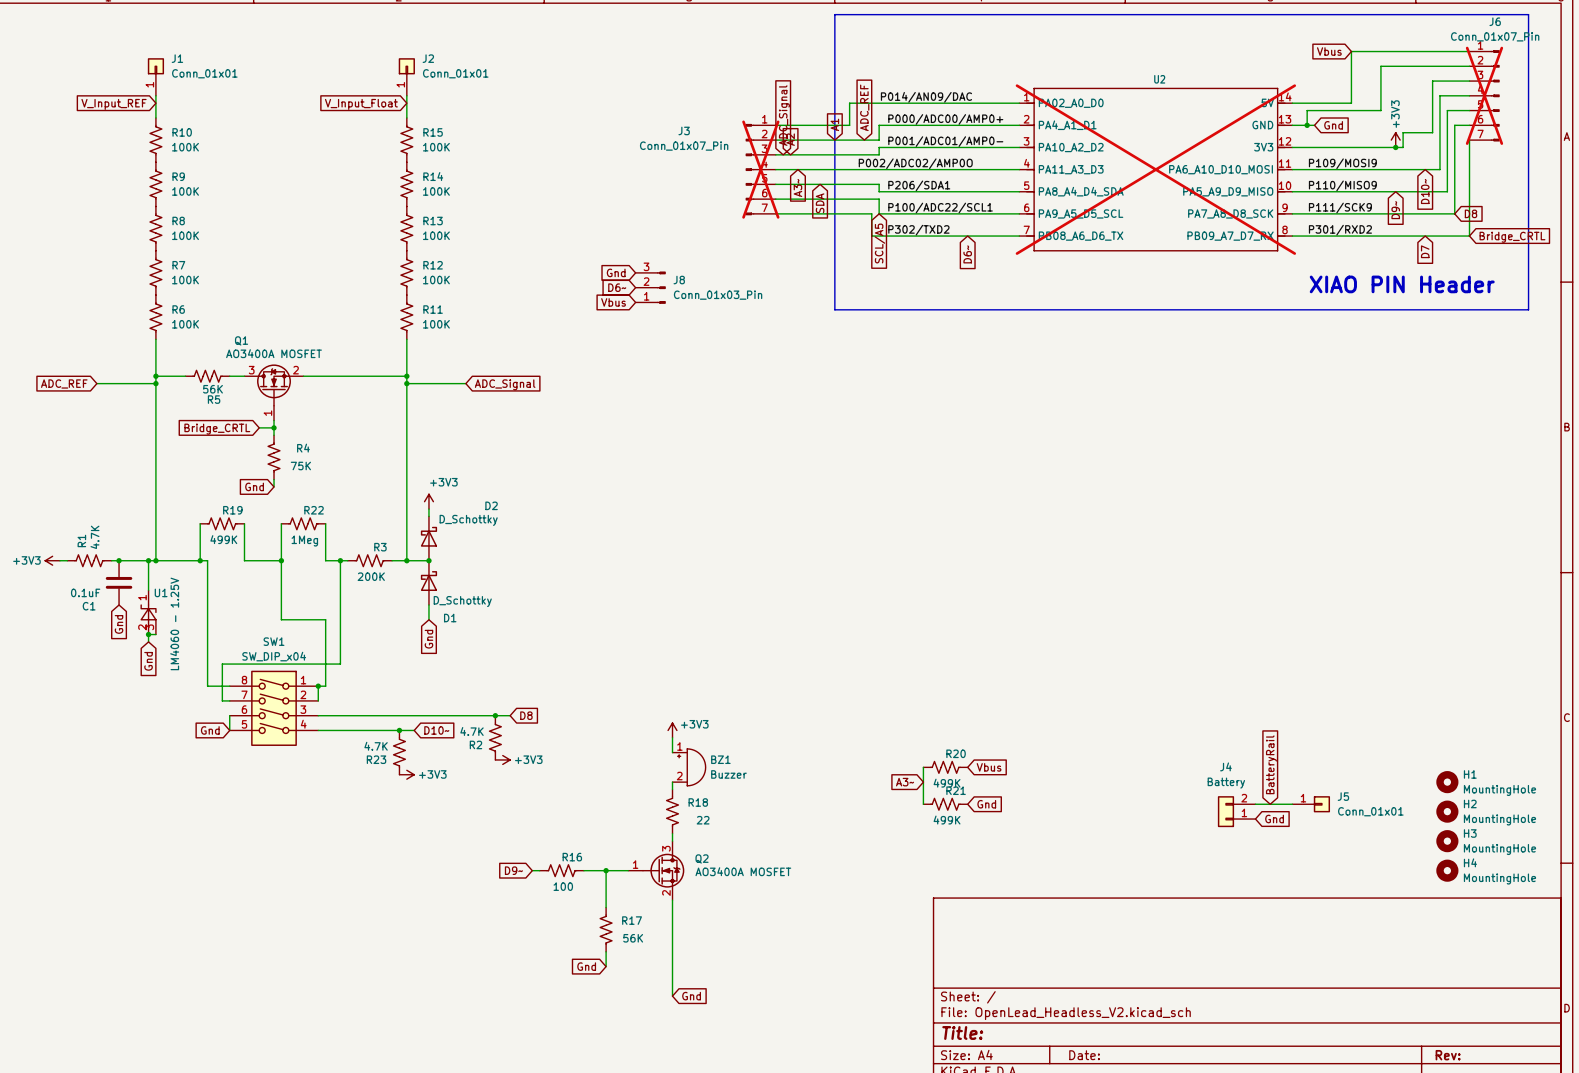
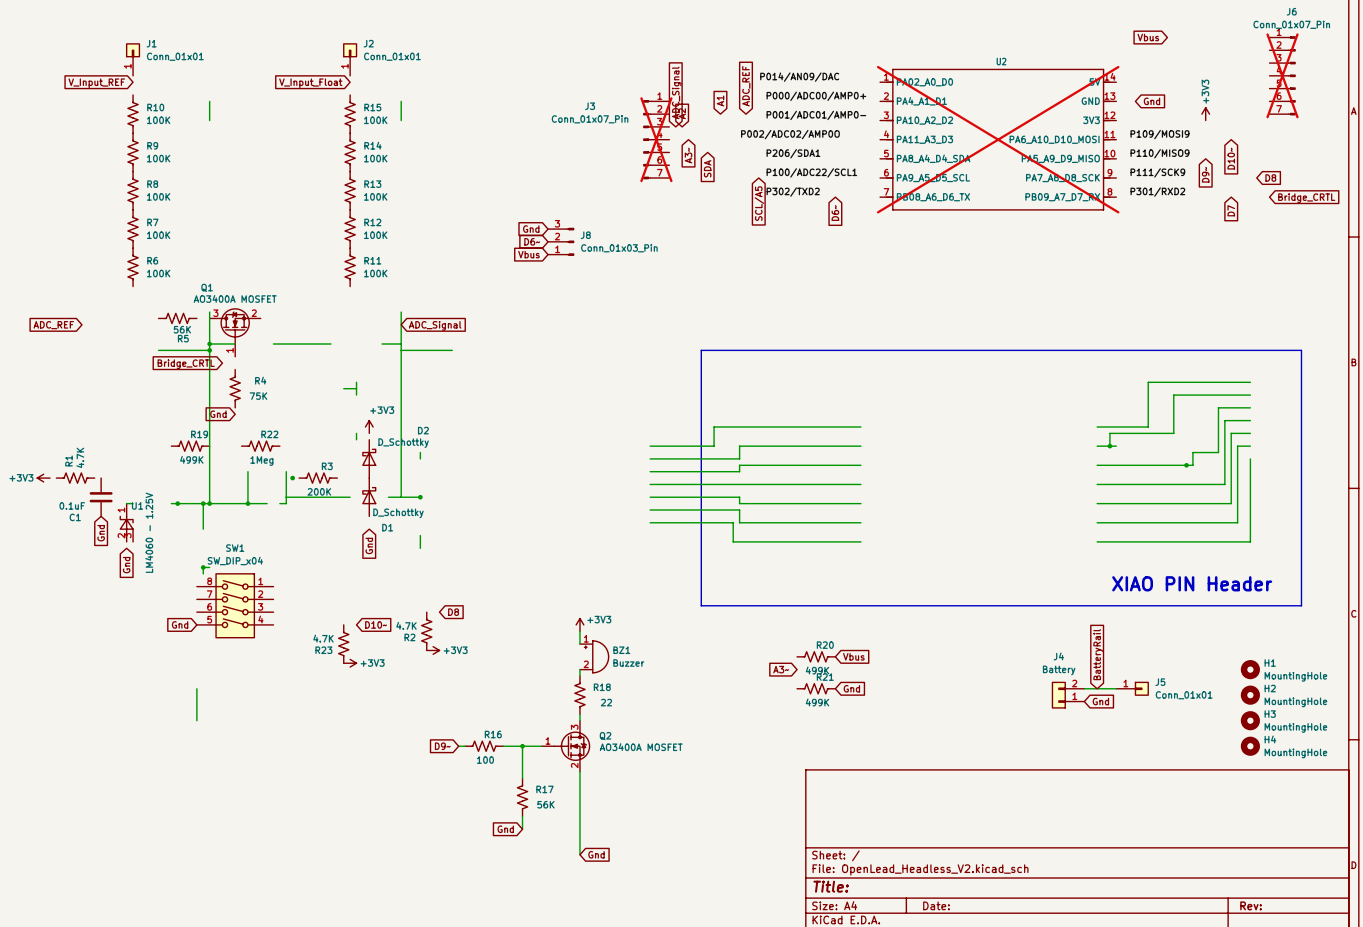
line: (834, 14) (1528, 14) (1528, 309) (834, 309) (834, 14) -> none
wire: (1469, 51) (1351, 51) (1351, 103) (1292, 103) -> none
wire: (1469, 66) (1380, 66) (1380, 110) (1307, 110) (1307, 125) -> none
wire: (1469, 81) (1432, 81) (1432, 132) (1403, 132) (1403, 147) (1292, 147) -> none
wire: (155, 95) (155, 117) -> (209, 101) (209, 120)
wire: (406, 95) (406, 117) -> (401, 101) (401, 120)
wire: (1469, 95) (1439, 95) (1439, 169) (1292, 169) -> none
wire: (1019, 103) (849, 103) (849, 125) (775, 125) -> none
wire: (1469, 110) (1447, 110) (1447, 191) (1292, 191) -> none
wire: (1019, 125) (879, 125) (879, 140) (775, 140) -> none
wire: (1292, 125) (1314, 125) -> none
junction: (1307, 125) -> none
wire: (1469, 125) (1454, 125) (1454, 213) (1292, 213) -> none
wire: (1469, 140) (1469, 236) (1292, 236) -> none
wire: (1019, 147) (879, 147) (879, 154) (775, 154) -> none
junction: (1395, 147) -> none
wire: (775, 169) (1019, 169) -> none
wire: (775, 184) (879, 184) (879, 191) (1019, 191) -> none
wire: (775, 199) (879, 199) (879, 213) (1019, 213) -> none
wire: (775, 213) (871, 213) (871, 236) (1019, 236) -> none
text: XIAO PIN Header (1402, 284) -> none
wire: (155, 339) (155, 560) -> none
wire: (406, 339) (406, 560) -> none
wire: none -> (209, 312) (209, 446)
wire: none -> (401, 312) (401, 497)
wire: (155, 376) (185, 376) -> (209, 343) (235, 343)
junction: (155, 376) -> none
wire: (229, 376) (244, 376) -> none
wire: (303, 376) (406, 376) -> none
junction: (406, 376) -> none
wire: (96, 383) (155, 383) -> (158, 350) (209, 350)
junction: (155, 383) -> none
wire: (406, 383) (465, 383) -> (401, 350) (452, 350)
junction: (406, 383) -> none
junction: none -> (209, 343)
wire: none -> (273, 343) (330, 343)
wire: none -> (382, 343) (401, 343)
junction: none -> (209, 350)
line: none -> (701, 350) (1301, 350) (1301, 605) (701, 605) (701, 350)
wire: (274, 420) (274, 435) -> (356, 382) (356, 395)
wire: (259, 427) (274, 427) -> (343, 388) (356, 388)
junction: (274, 427) -> none
wire: none -> (1250, 382) (1148, 382) (1148, 427) (1097, 427)
wire: none -> (1250, 395) (1173, 395) (1173, 433) (1109, 433) (1109, 446)
wire: (274, 479) (274, 486) -> (356, 433) (356, 439)
wire: none -> (1250, 407) (1218, 407) (1218, 452) (1192, 452) (1192, 465) (1097, 465)
wire: none -> (1250, 420) (1224, 420) (1224, 484) (1097, 484)
wire: none -> (860, 427) (714, 427) (714, 446) (650, 446)
wire: (428, 509) (428, 516) -> (420, 452) (420, 458)
wire: none -> (1250, 433) (1231, 433) (1231, 503) (1097, 503)
wire: (200, 523) (200, 560) -> (247, 471) (247, 503)
wire: (281, 523) (281, 619) (325, 619) (325, 686) (318, 686) (318, 700) -> none
wire: (325, 523) (325, 560) (347, 560) -> none
wire: none -> (860, 446) (739, 446) (739, 458) (650, 458)
wire: none -> (1097, 446) (1116, 446)
junction: none -> (1109, 446)
wire: none -> (1250, 446) (1237, 446) (1237, 522) (1097, 522)
wire: none -> (1250, 458) (1250, 541) (1097, 541)
wire: none -> (860, 465) (739, 465) (739, 471) (650, 471)
junction: none -> (1186, 465)
wire: none -> (286, 471) (286, 503) (279, 503)
wire: (59, 560) (67, 560) -> none
wire: (111, 560) (207, 560) (207, 686) (229, 686) -> none
junction: (119, 560) -> none
wire: (148, 560) (148, 590) -> (133, 503) (126, 503)
junction: (148, 560) -> none
junction: (155, 560) -> none
junction: (200, 560) -> none
wire: (244, 560) (281, 560) -> (209, 478) (209, 503)
junction: (281, 560) -> none
wire: (340, 560) (340, 664) (244, 664) -> none
wire: (392, 560) (428, 560) -> (388, 497) (420, 497)
junction: (406, 560) -> none
junction: (428, 560) -> none
wire: none -> (650, 484) (860, 484)
wire: none -> (286, 497) (350, 497)
junction: none -> (420, 497)
wire: none -> (650, 497) (739, 497) (739, 503) (860, 503)
wire: none -> (171, 503) (267, 503)
junction: none -> (177, 503)
wire: none -> (203, 503) (203, 529)
junction: none -> (203, 503)
junction: none -> (209, 503)
junction: none -> (247, 503)
wire: none -> (650, 510) (739, 510) (739, 522) (860, 522)
wire: (428, 605) (428, 619) -> (420, 535) (420, 548)
wire: none -> (650, 522) (733, 522) (733, 541) (860, 541)
junction: (148, 634) -> none
wire: (155, 634) (148, 634) (148, 641) -> none
wire: (237, 664) (222, 664) (222, 700) (229, 700) -> (203, 567) (203, 573)
junction: none -> (203, 567)
text: none -> XIAO PIN Header (1192, 583)
junction: (318, 686) -> none
wire: (229, 715) (229, 730) -> none
wire: (318, 715) (510, 715) -> none
junction: (495, 715) -> none
wire: (318, 730) (414, 730) -> none
junction: (399, 730) -> none
wire: (923, 767) (923, 804) -> none
wire: none -> (196, 688) (196, 720)

